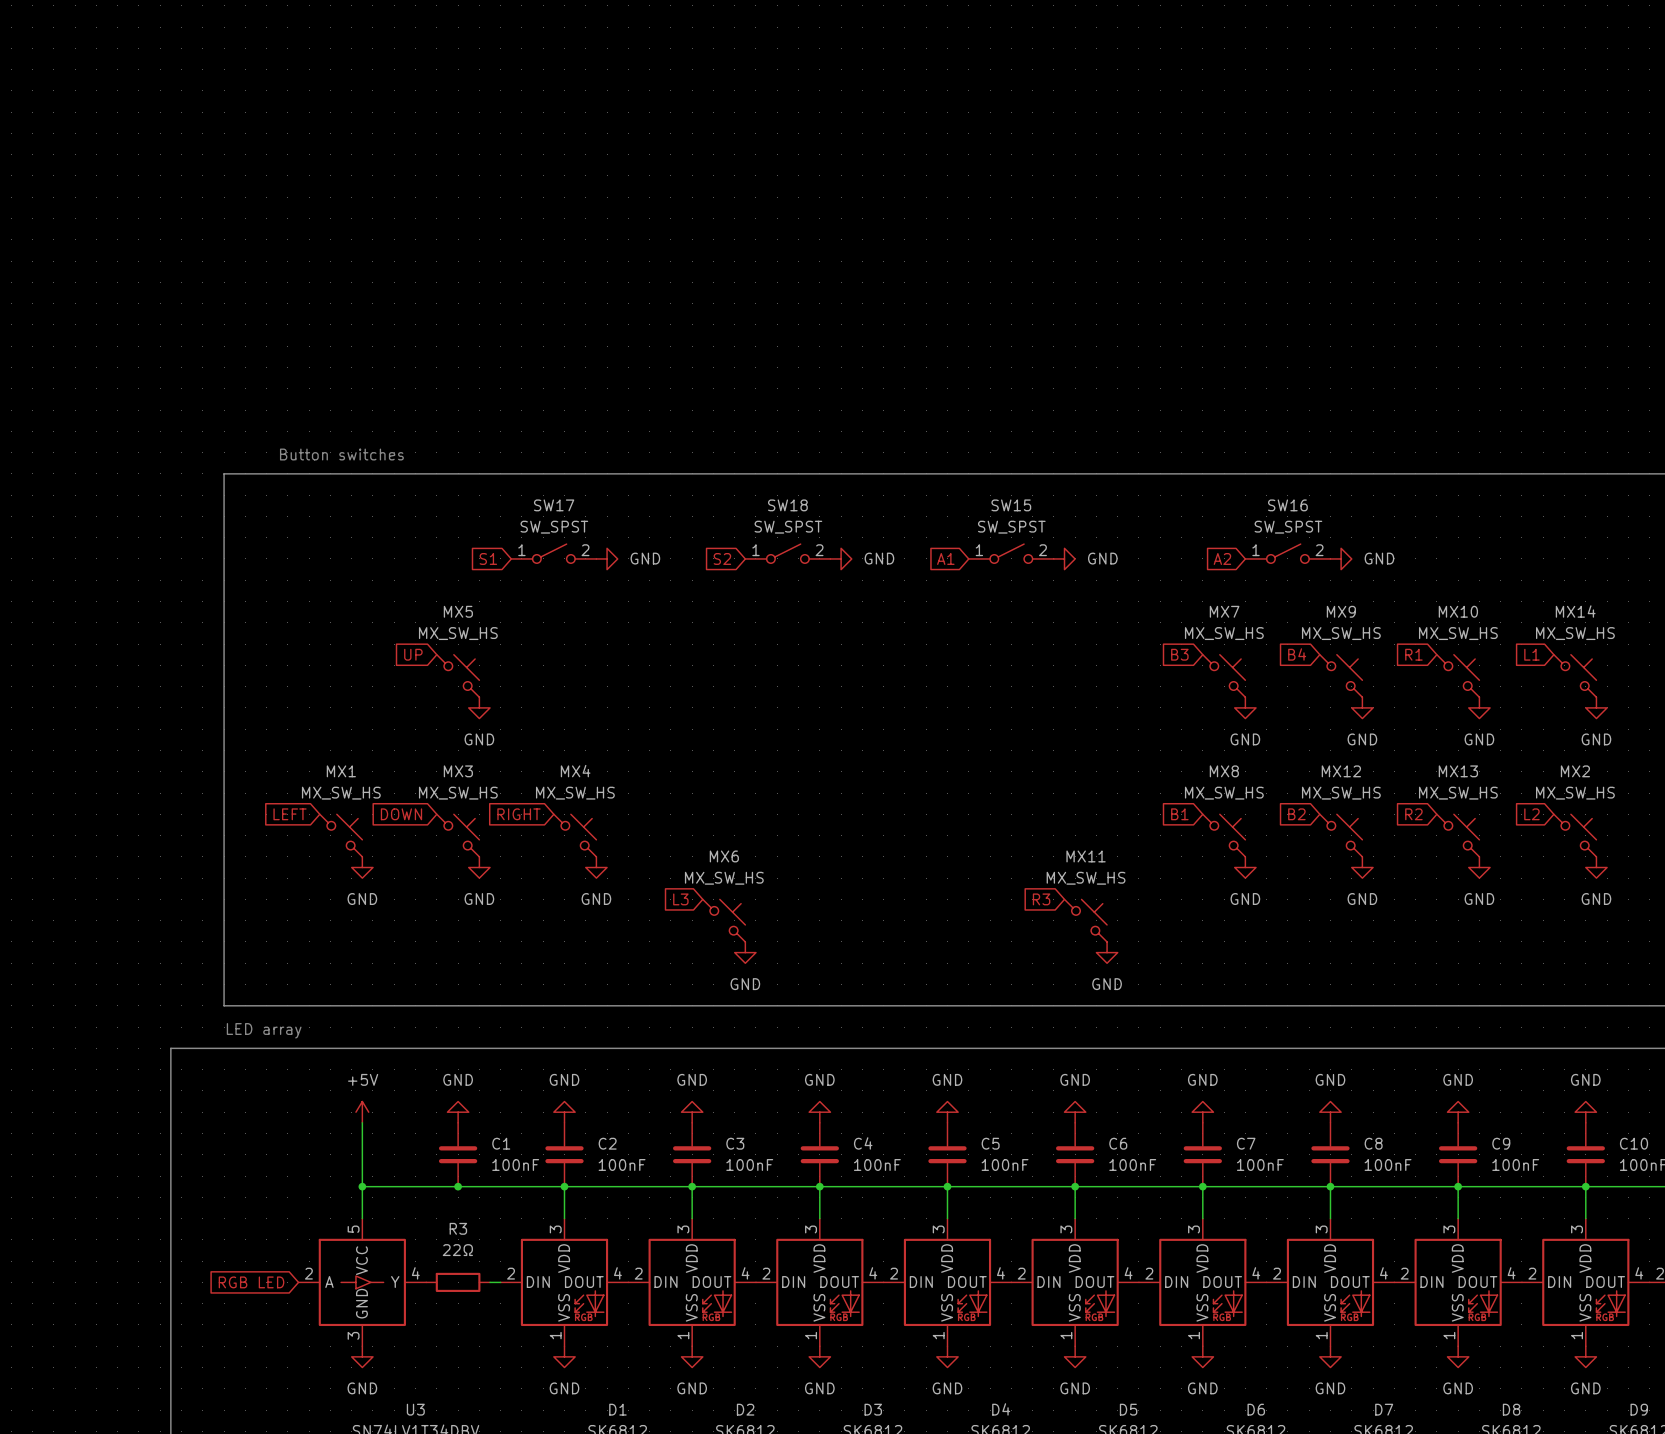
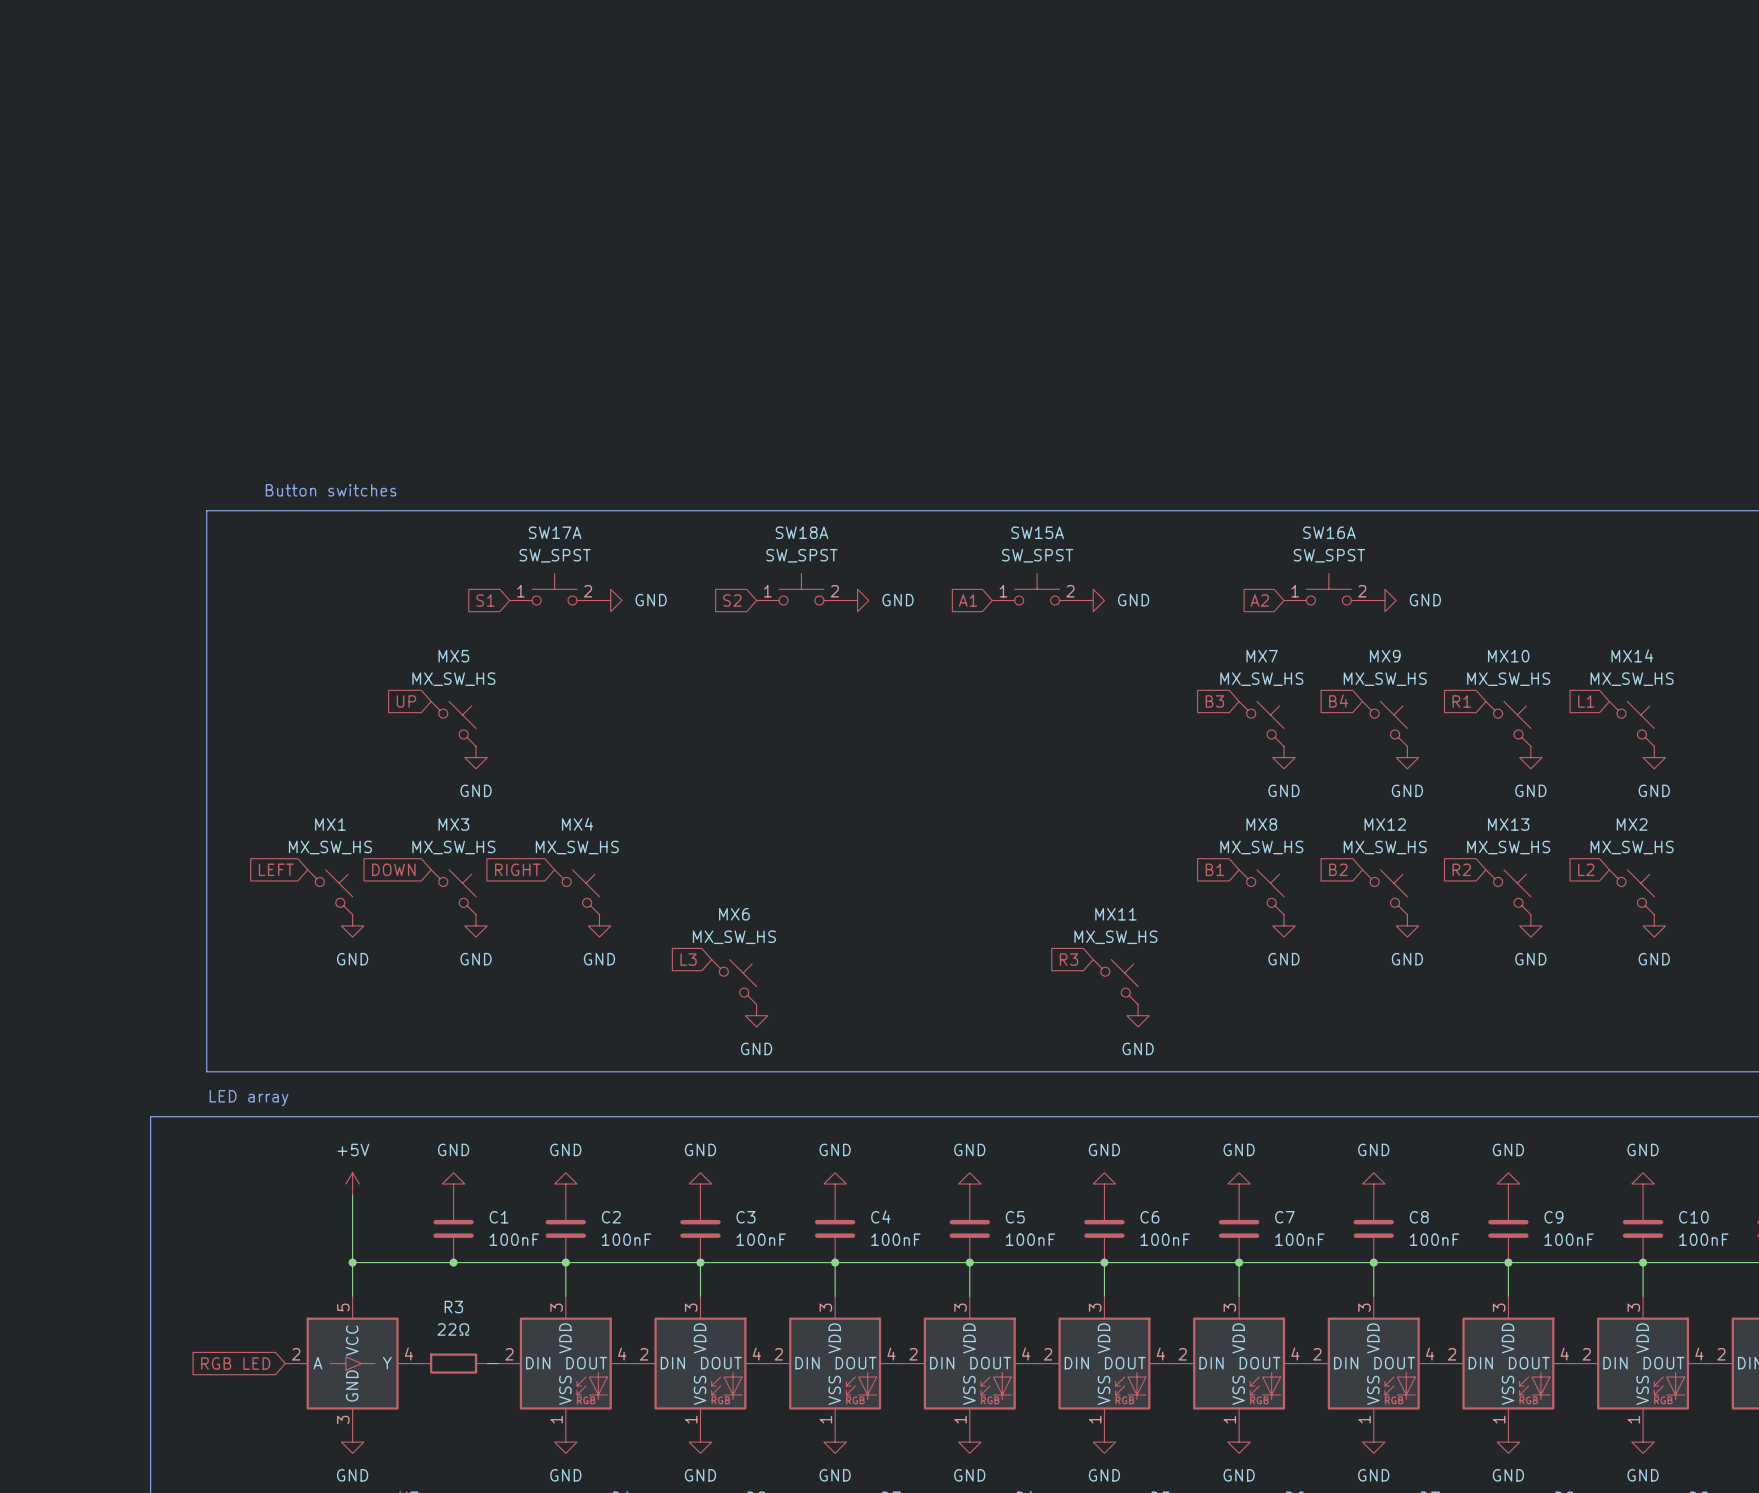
SW17A: none -> SW_SPST (554, 589)
SW18A: none -> SW_SPST (801, 589)
SW15A: none -> SW_SPST (1037, 589)
SW16A: none -> SW_SPST (1328, 589)
SW17: SW_SPST (553, 553) -> none
SW18: SW_SPST (787, 553) -> none
SW15: SW_SPST (1011, 553) -> none
SW16: SW_SPST (1287, 553) -> none

